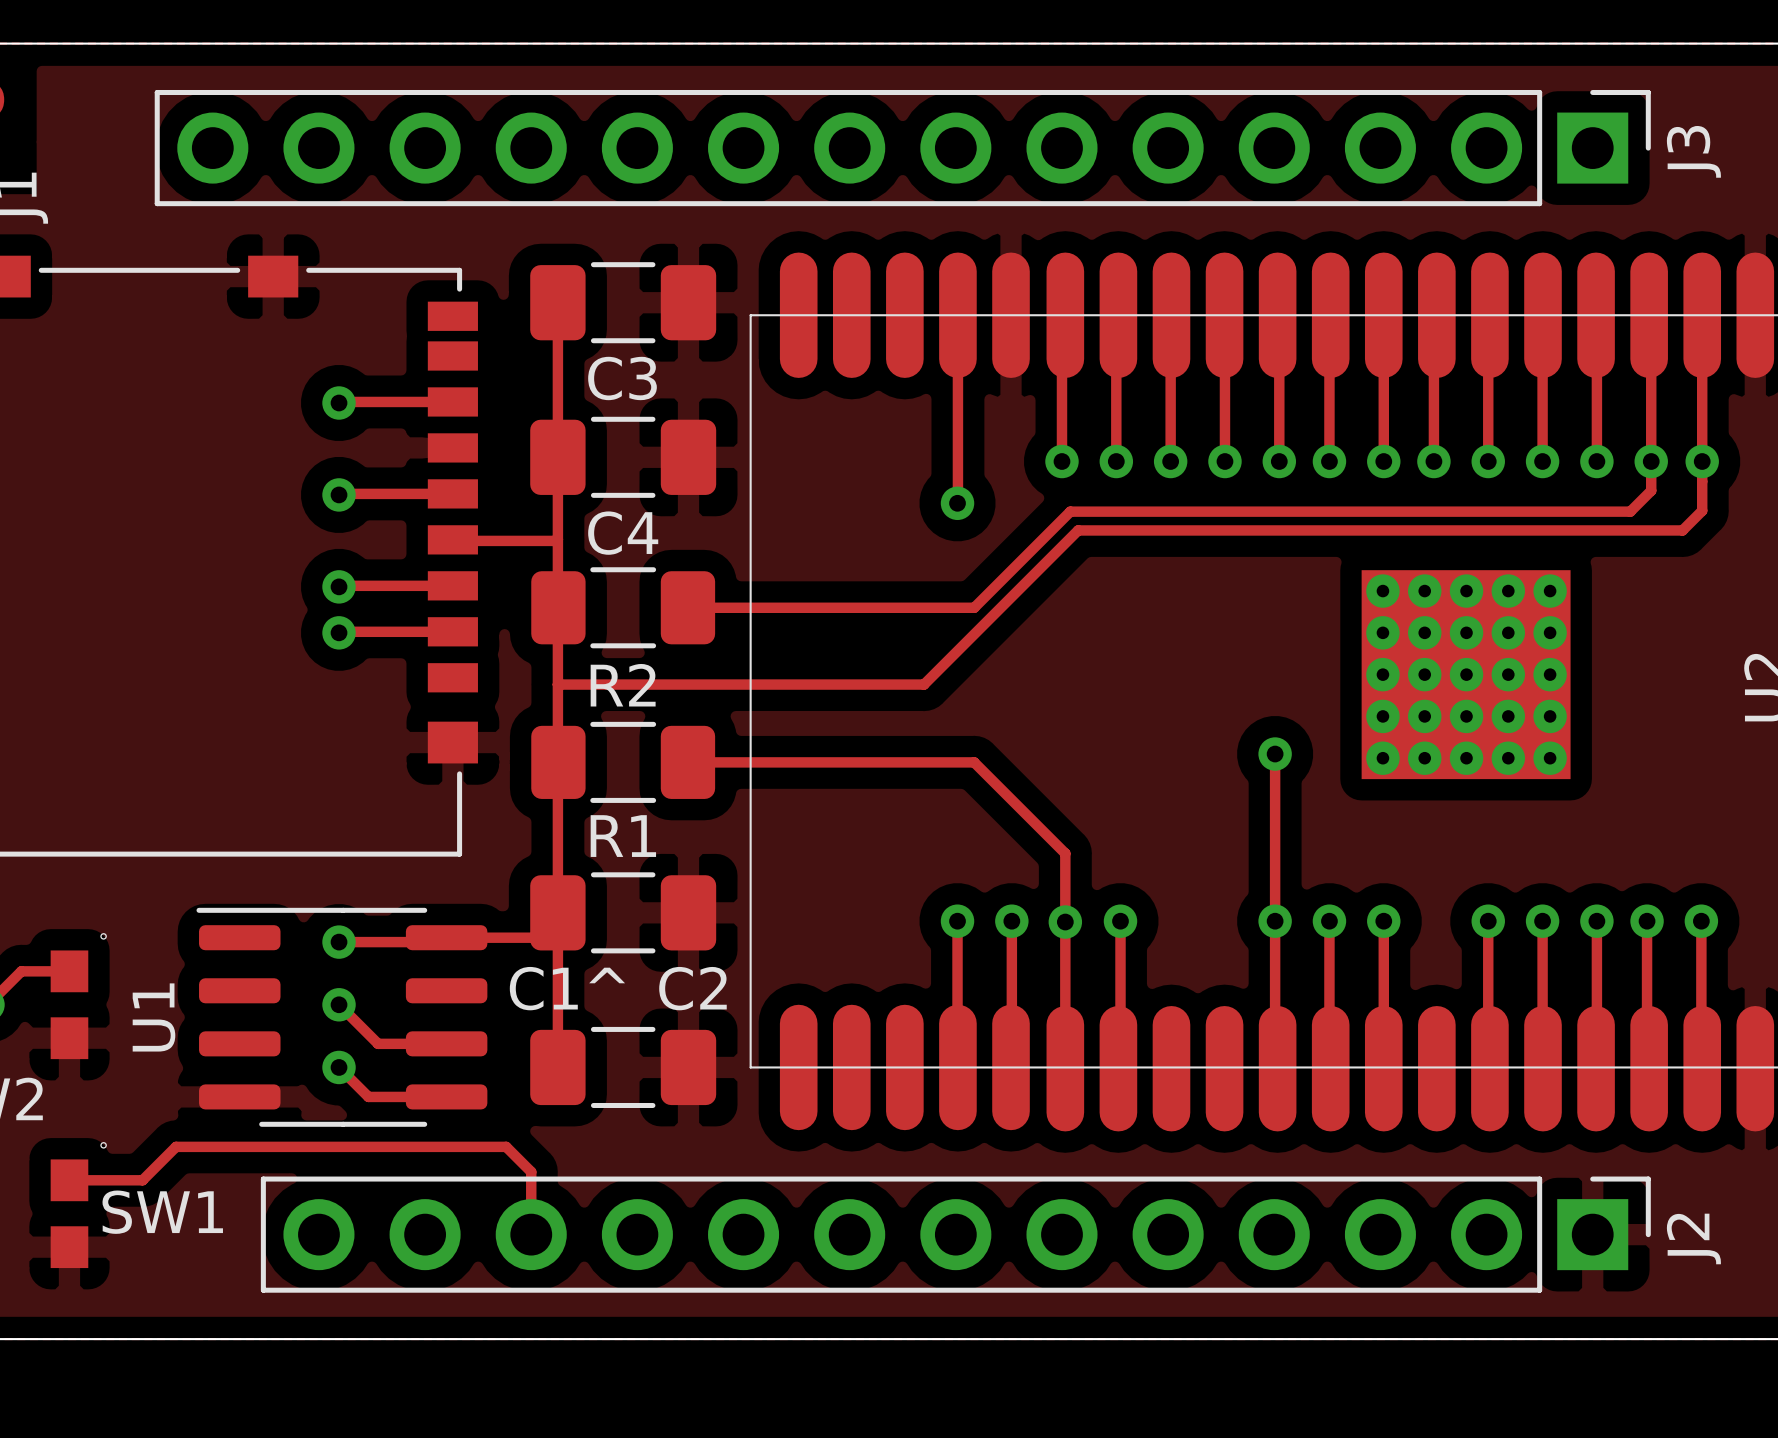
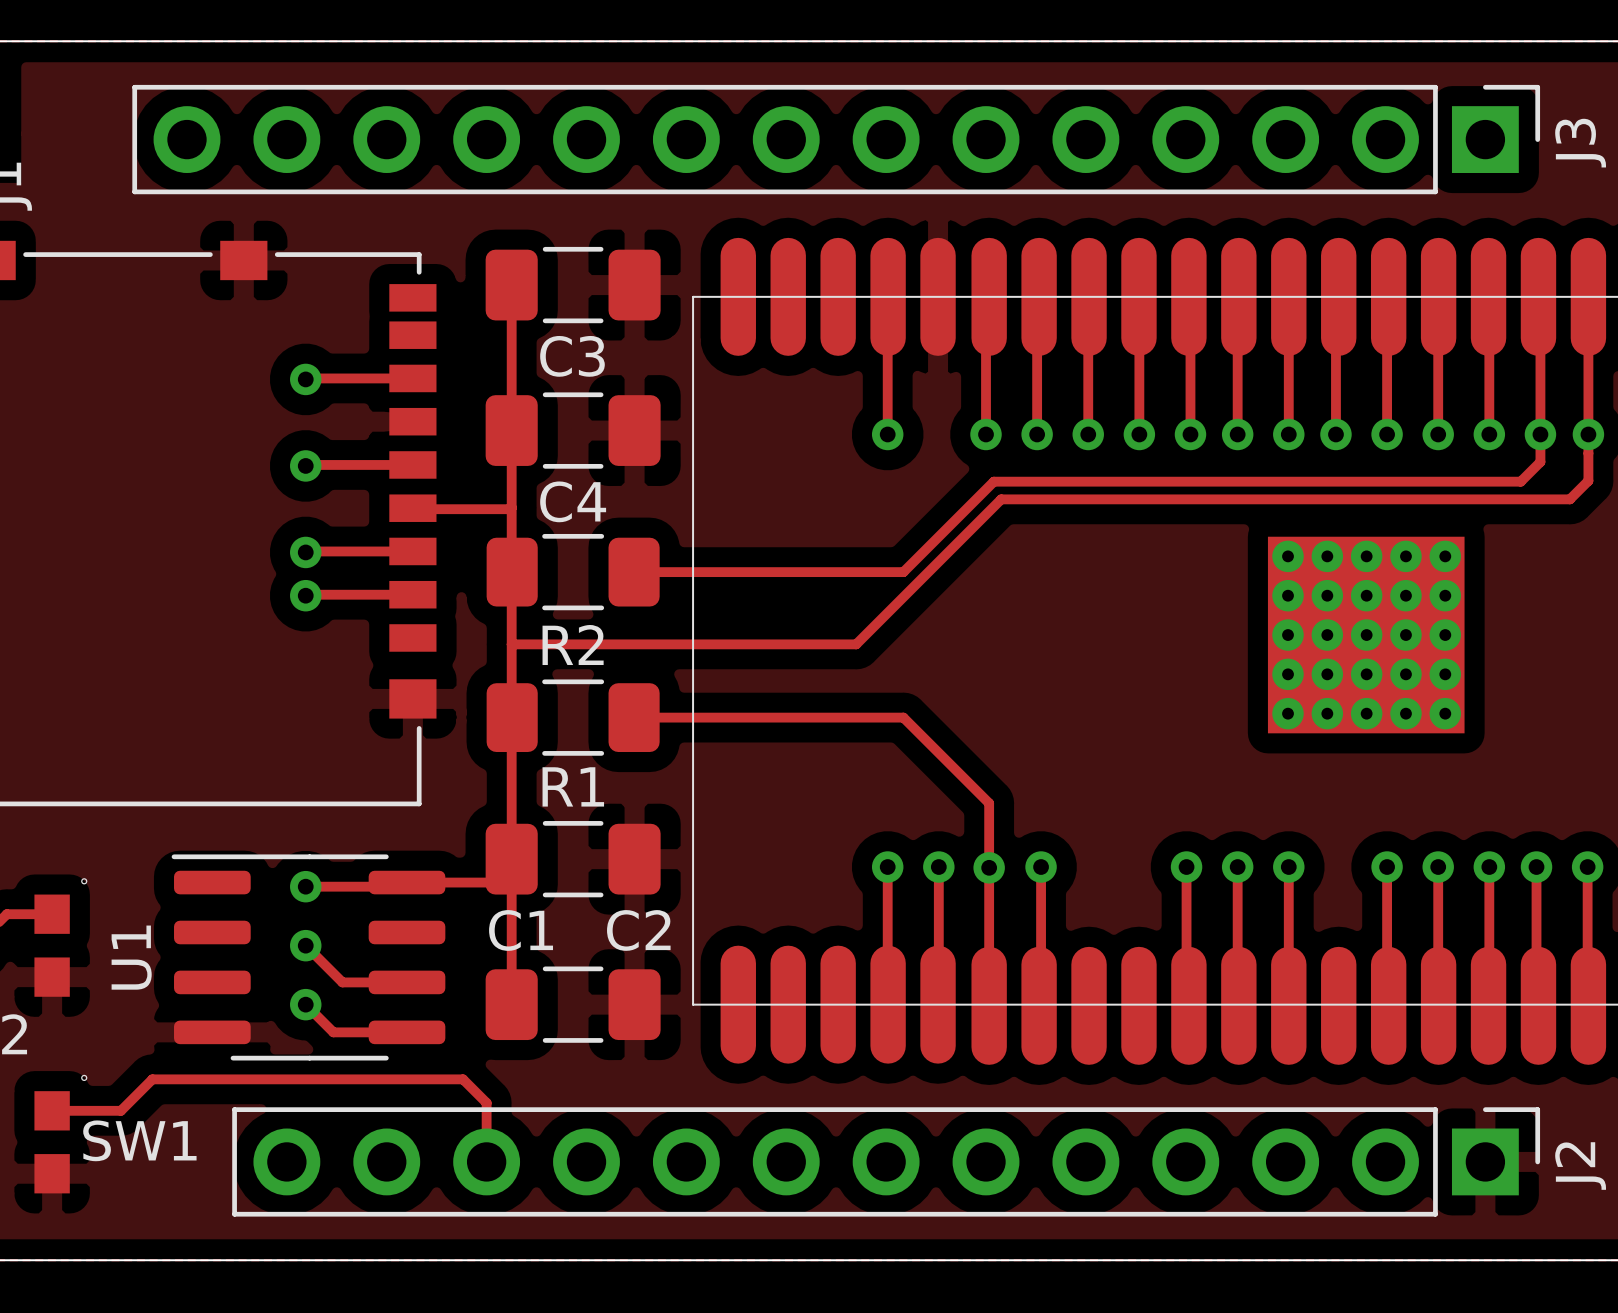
track: (957, 315) (957, 502) -> (887, 297) (887, 434)
via position: (957, 503) -> (887, 434)
track: (1275, 754) (1275, 921) -> none
via: (1275, 754) -> none
C1^ name: C1^ (567, 988) -> C1 (521, 930)

